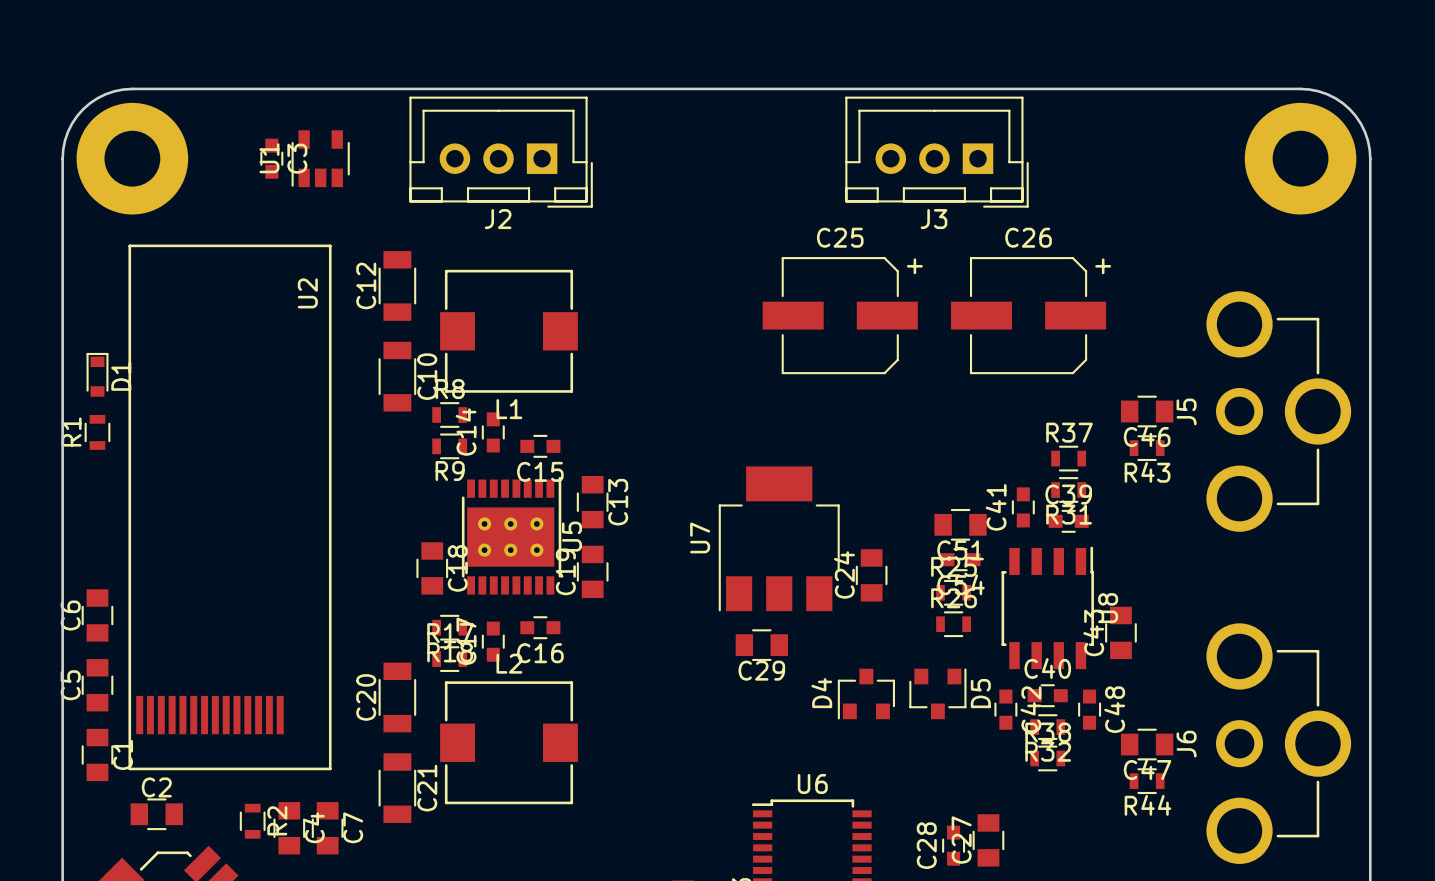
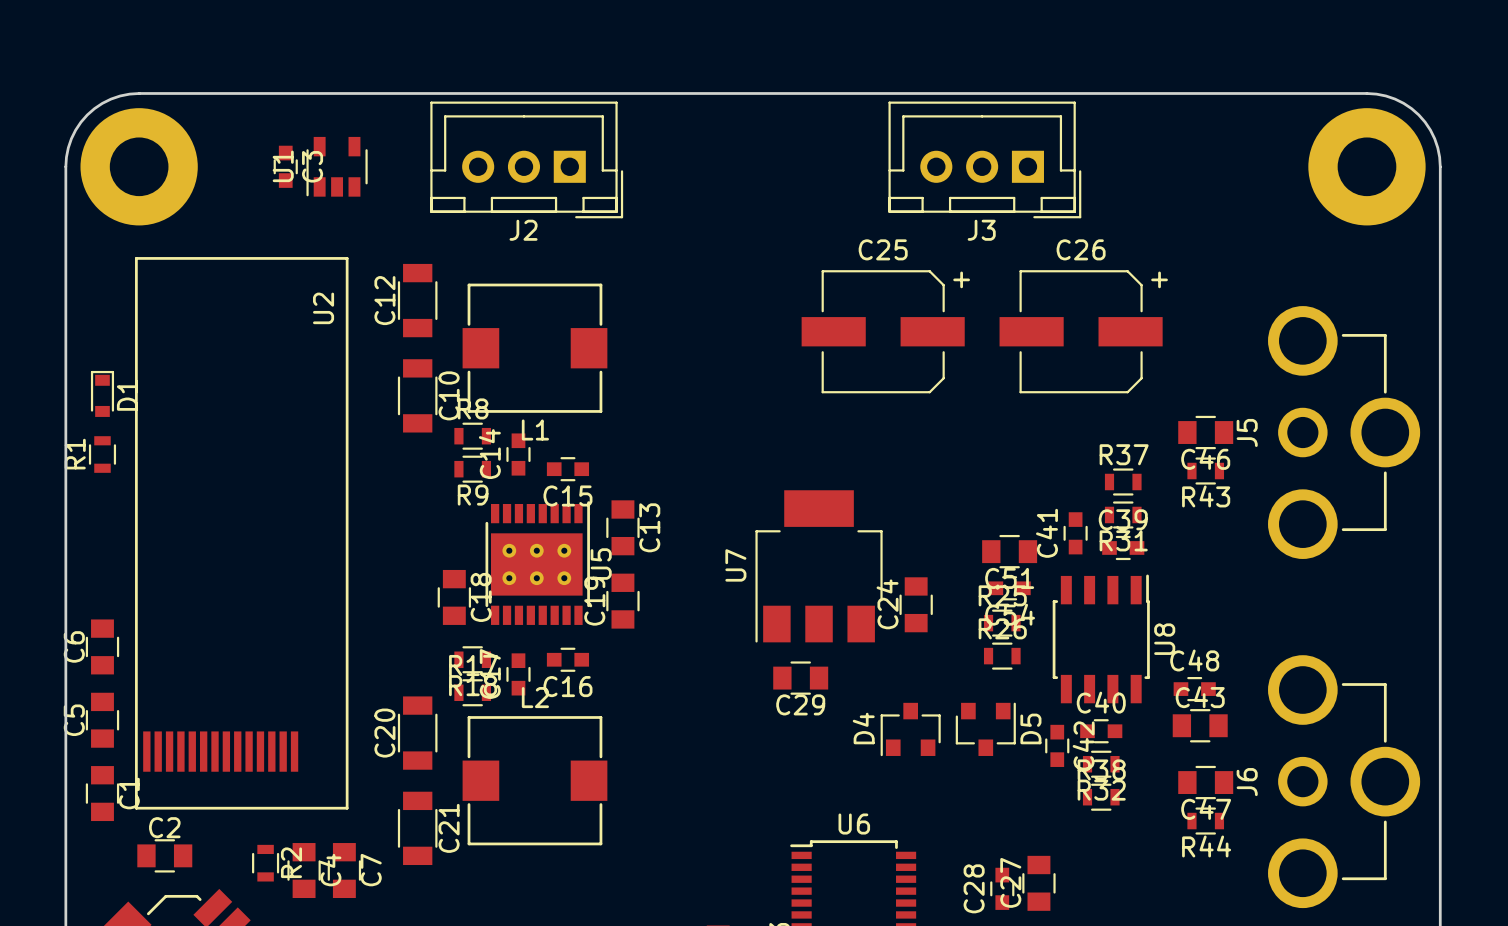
C43 rotation: 0° (1120, 632) -> 90° clockwise (1200, 725)
C43 position: (1120, 632) -> (1200, 725)
C48 rotation: 0° (1089, 709) -> 90° clockwise (1194, 689)
C48 position: (1089, 709) -> (1194, 689)
C48 name position: C48 (1114, 709) -> C48 (1194, 660)

